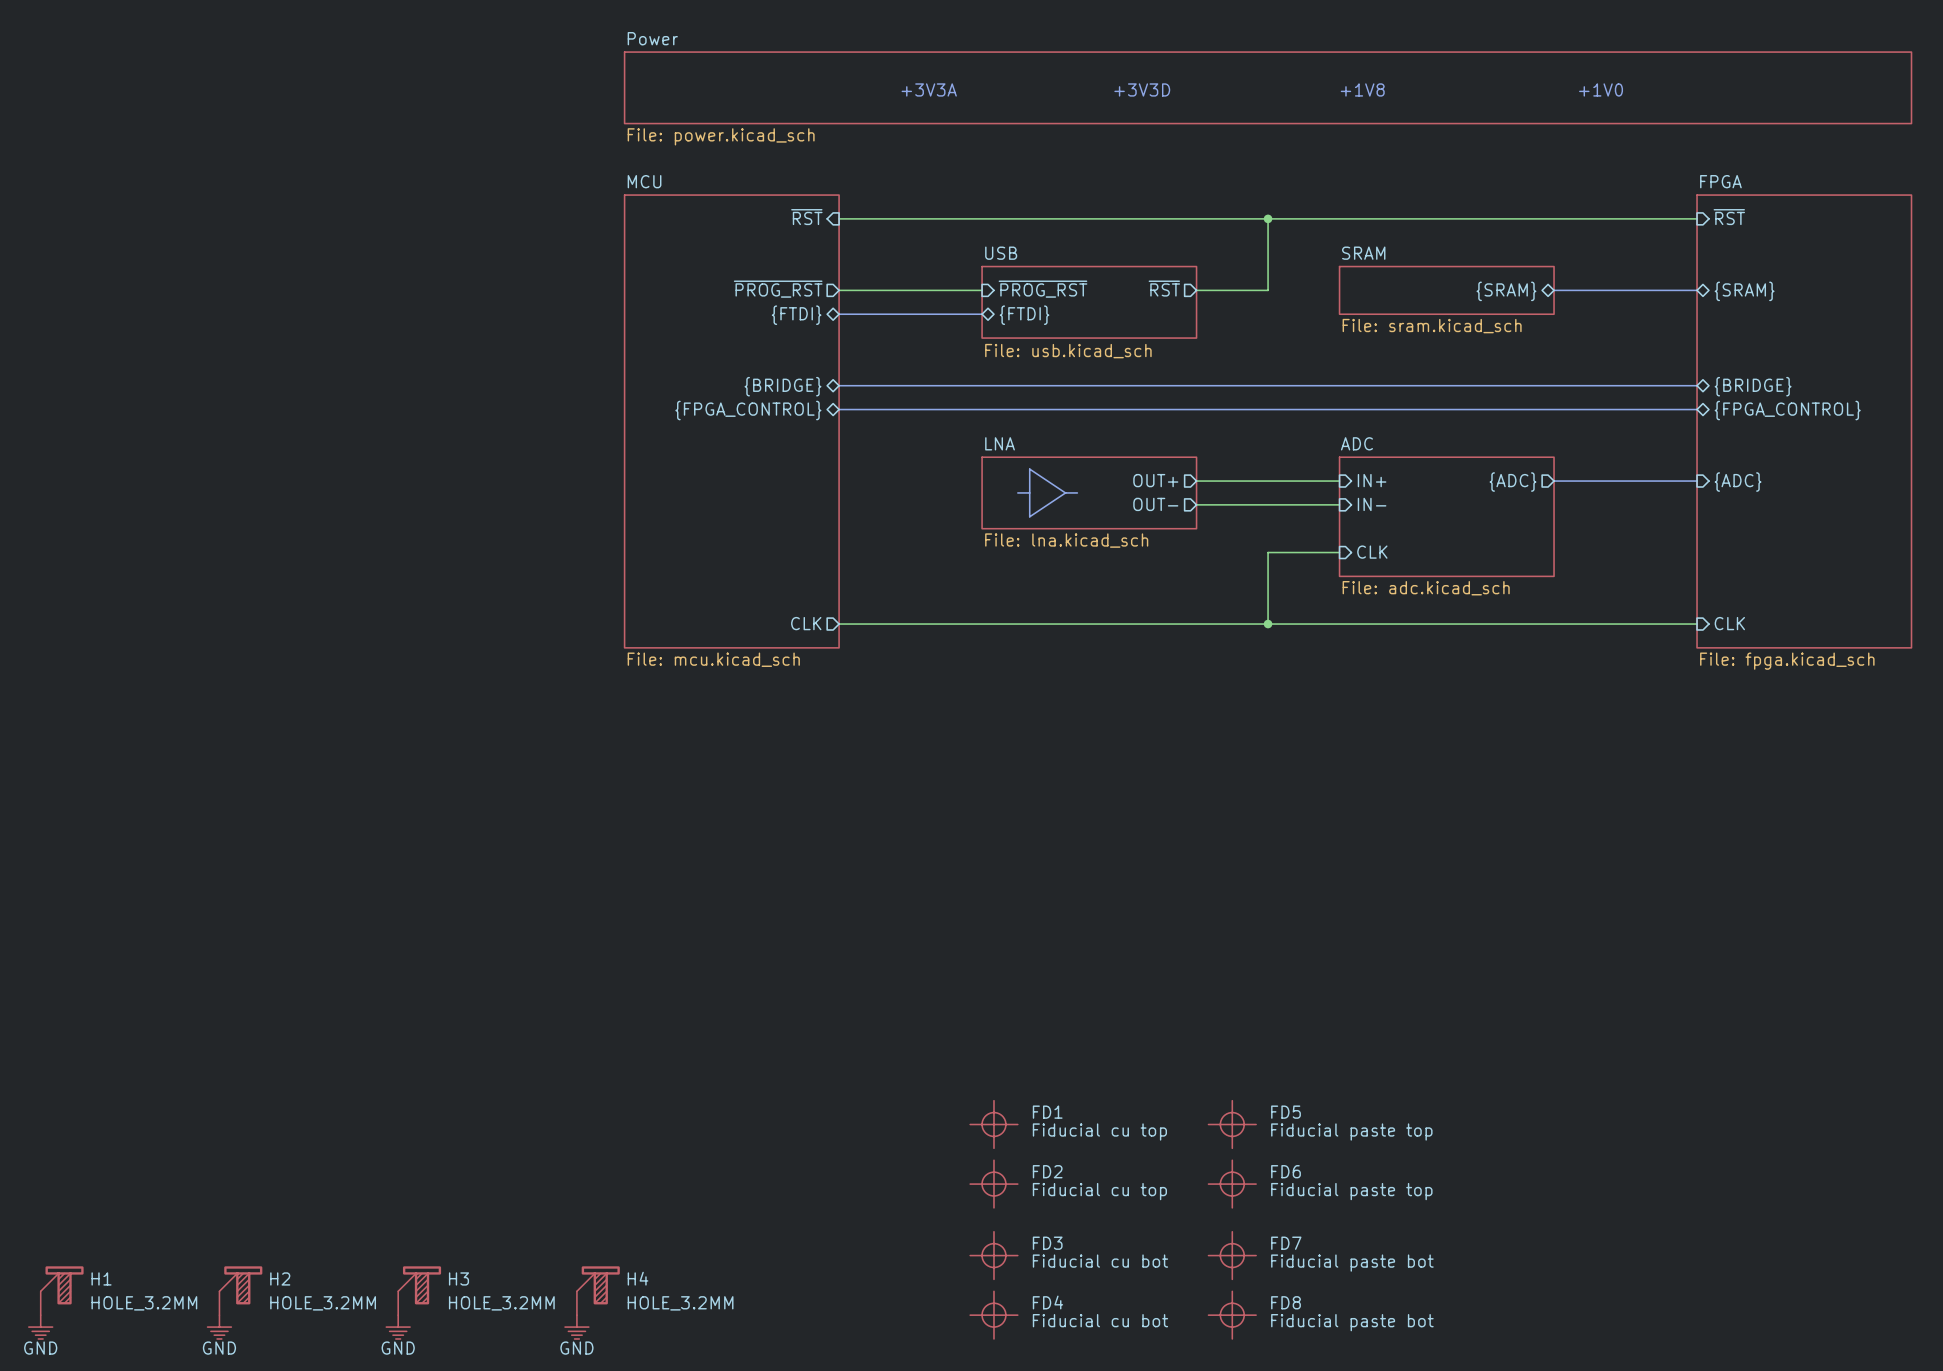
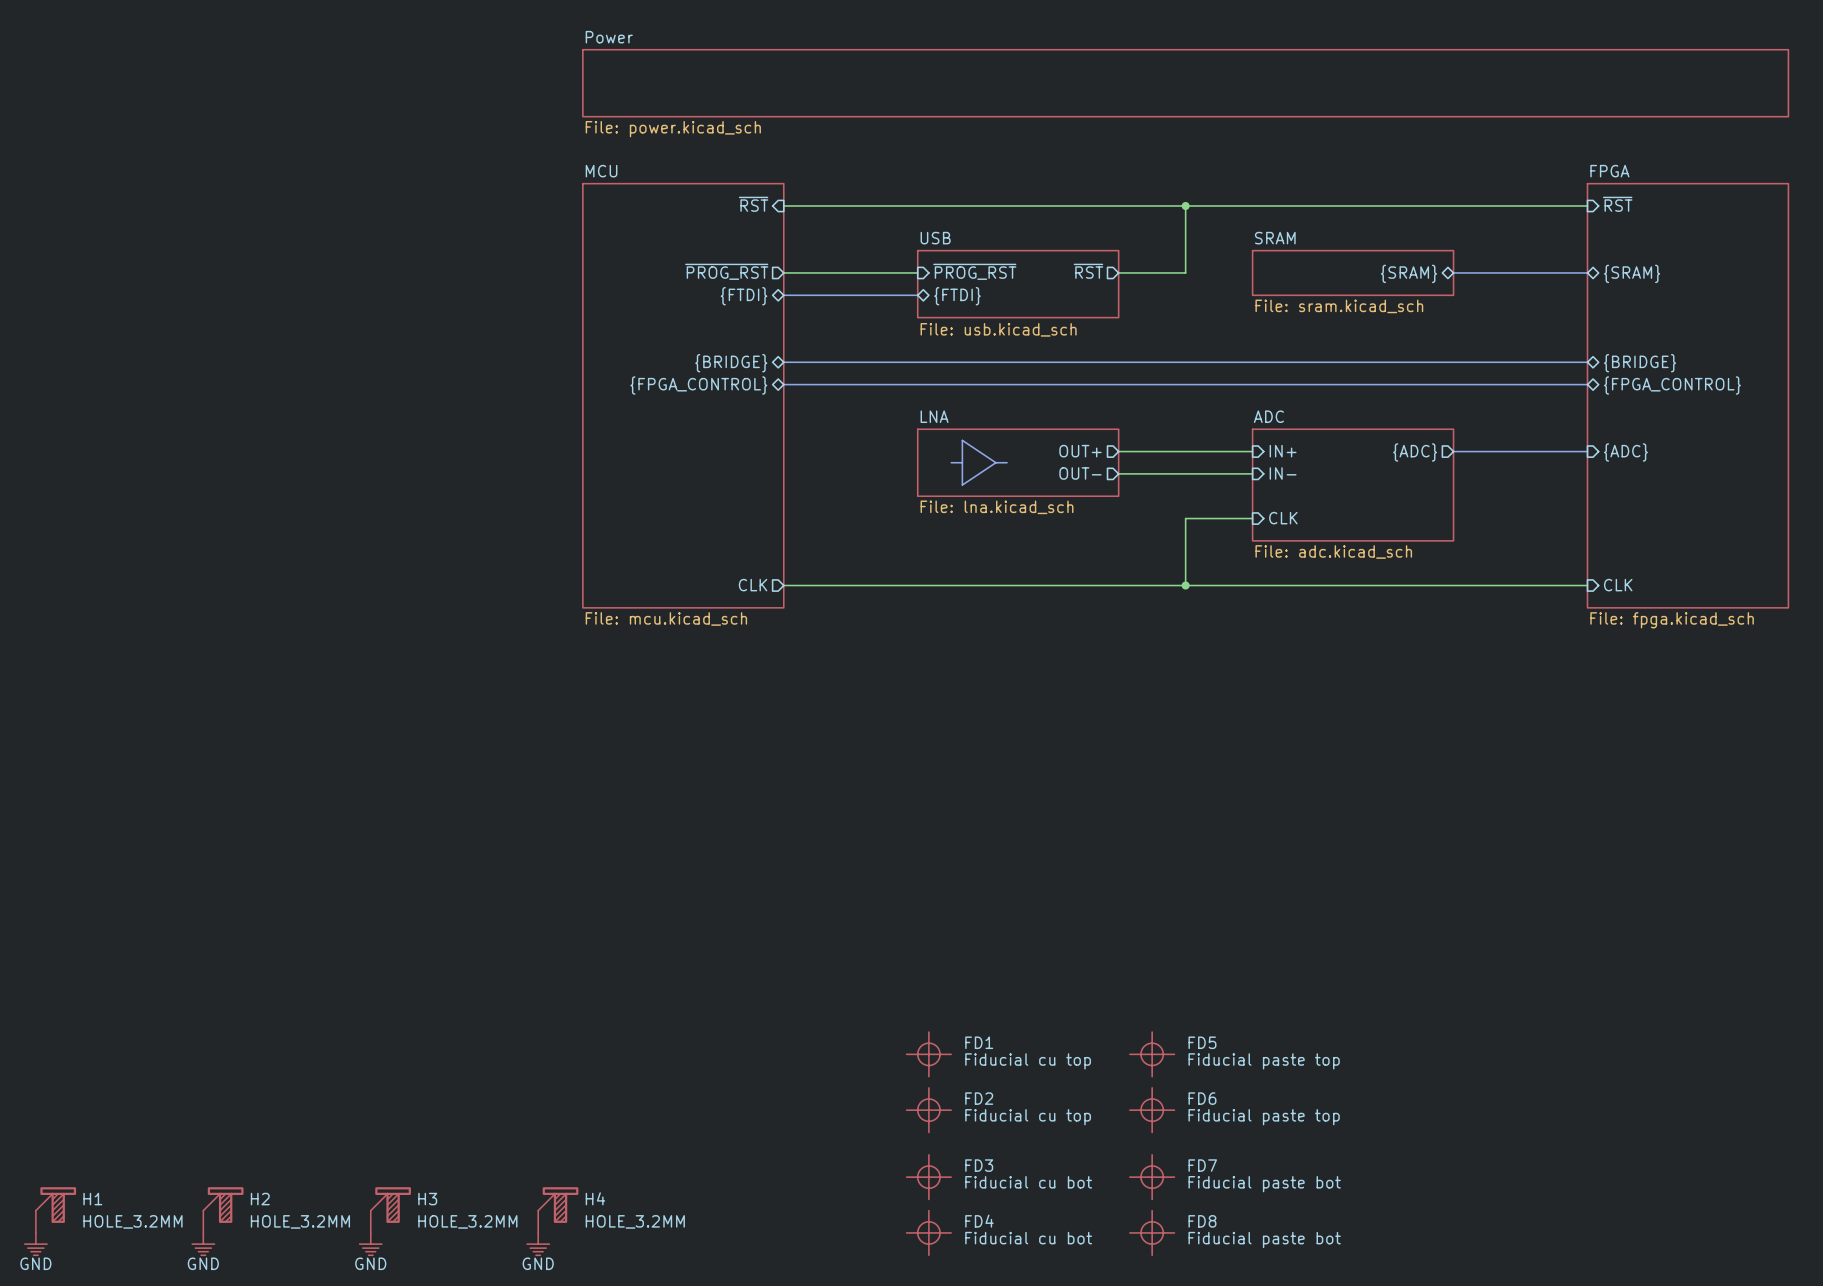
text: +3V3A (929, 89) -> none
text: +3V3D (1142, 89) -> none
text: +1V8 (1362, 89) -> none
text: +1V0 (1601, 89) -> none

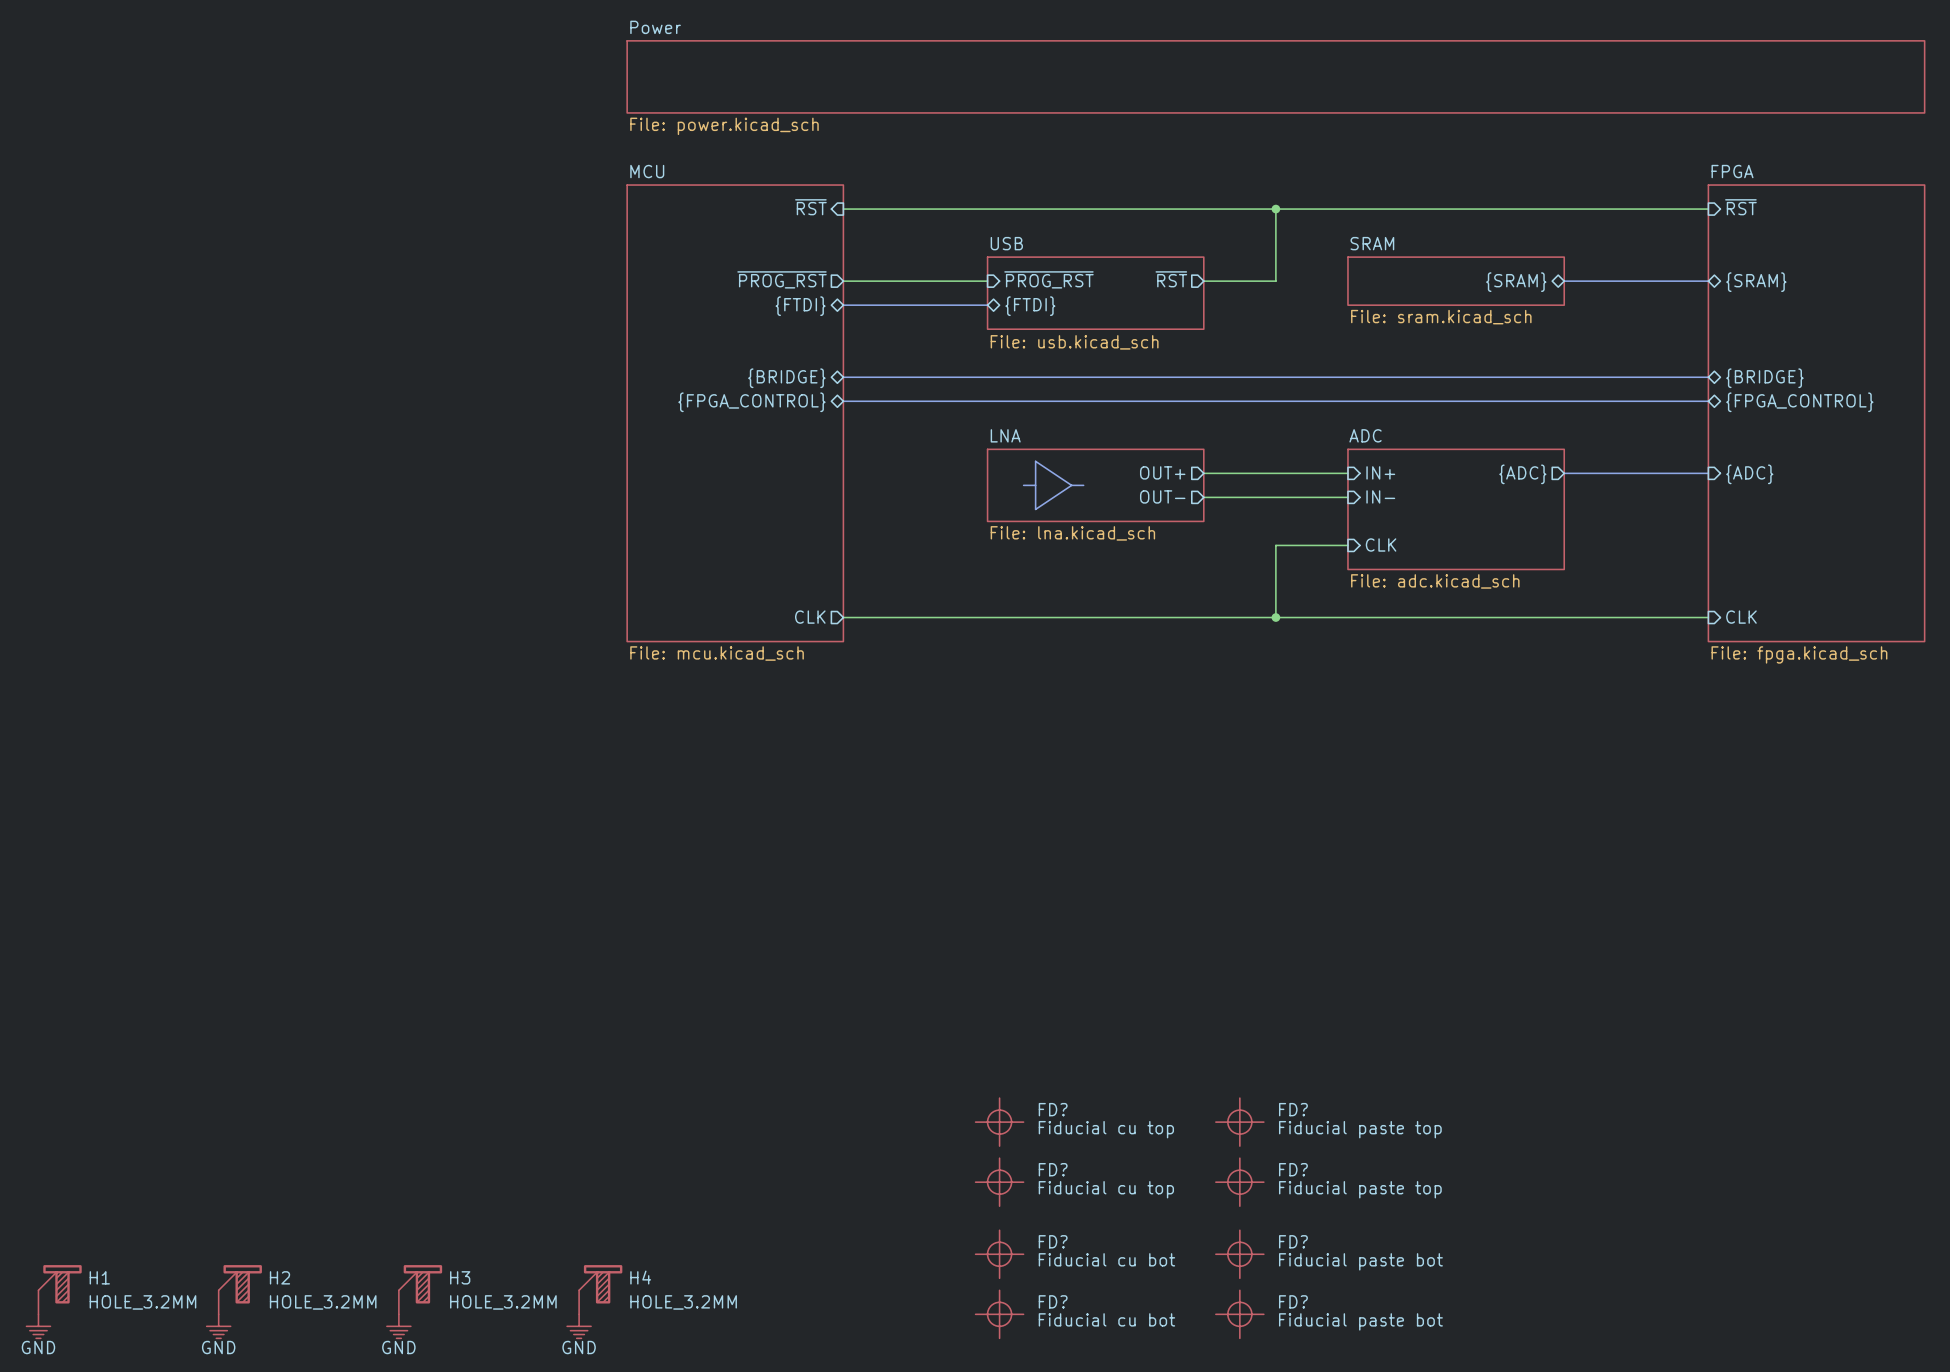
FD1 name: FD1 (979, 1042) -> FD? (1053, 1109)
FD5 name: FD5 (1202, 1042) -> FD? (1293, 1109)
FD2 name: FD2 (979, 1098) -> FD? (1053, 1169)
FD6 name: FD6 (1202, 1098) -> FD? (1293, 1169)
FD3 name: FD3 (979, 1165) -> FD? (1053, 1241)
FD7 name: FD7 (1202, 1165) -> FD? (1293, 1241)
FD4 name: FD4 (979, 1221) -> FD? (1053, 1301)
FD8 name: FD8 (1202, 1221) -> FD? (1293, 1301)

